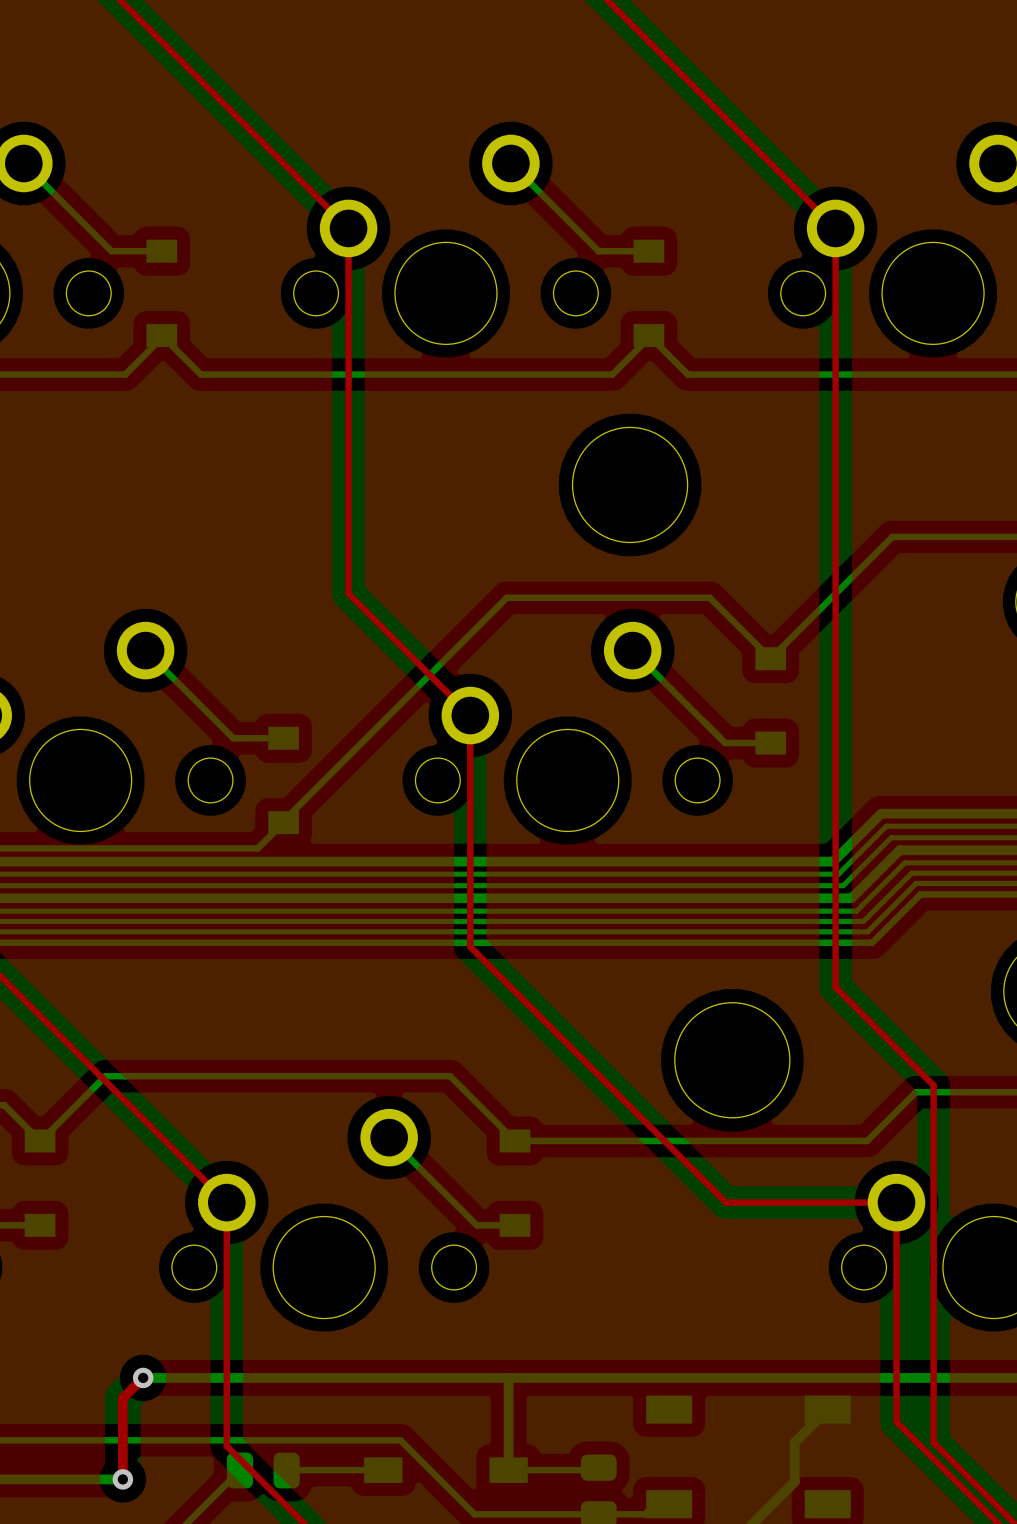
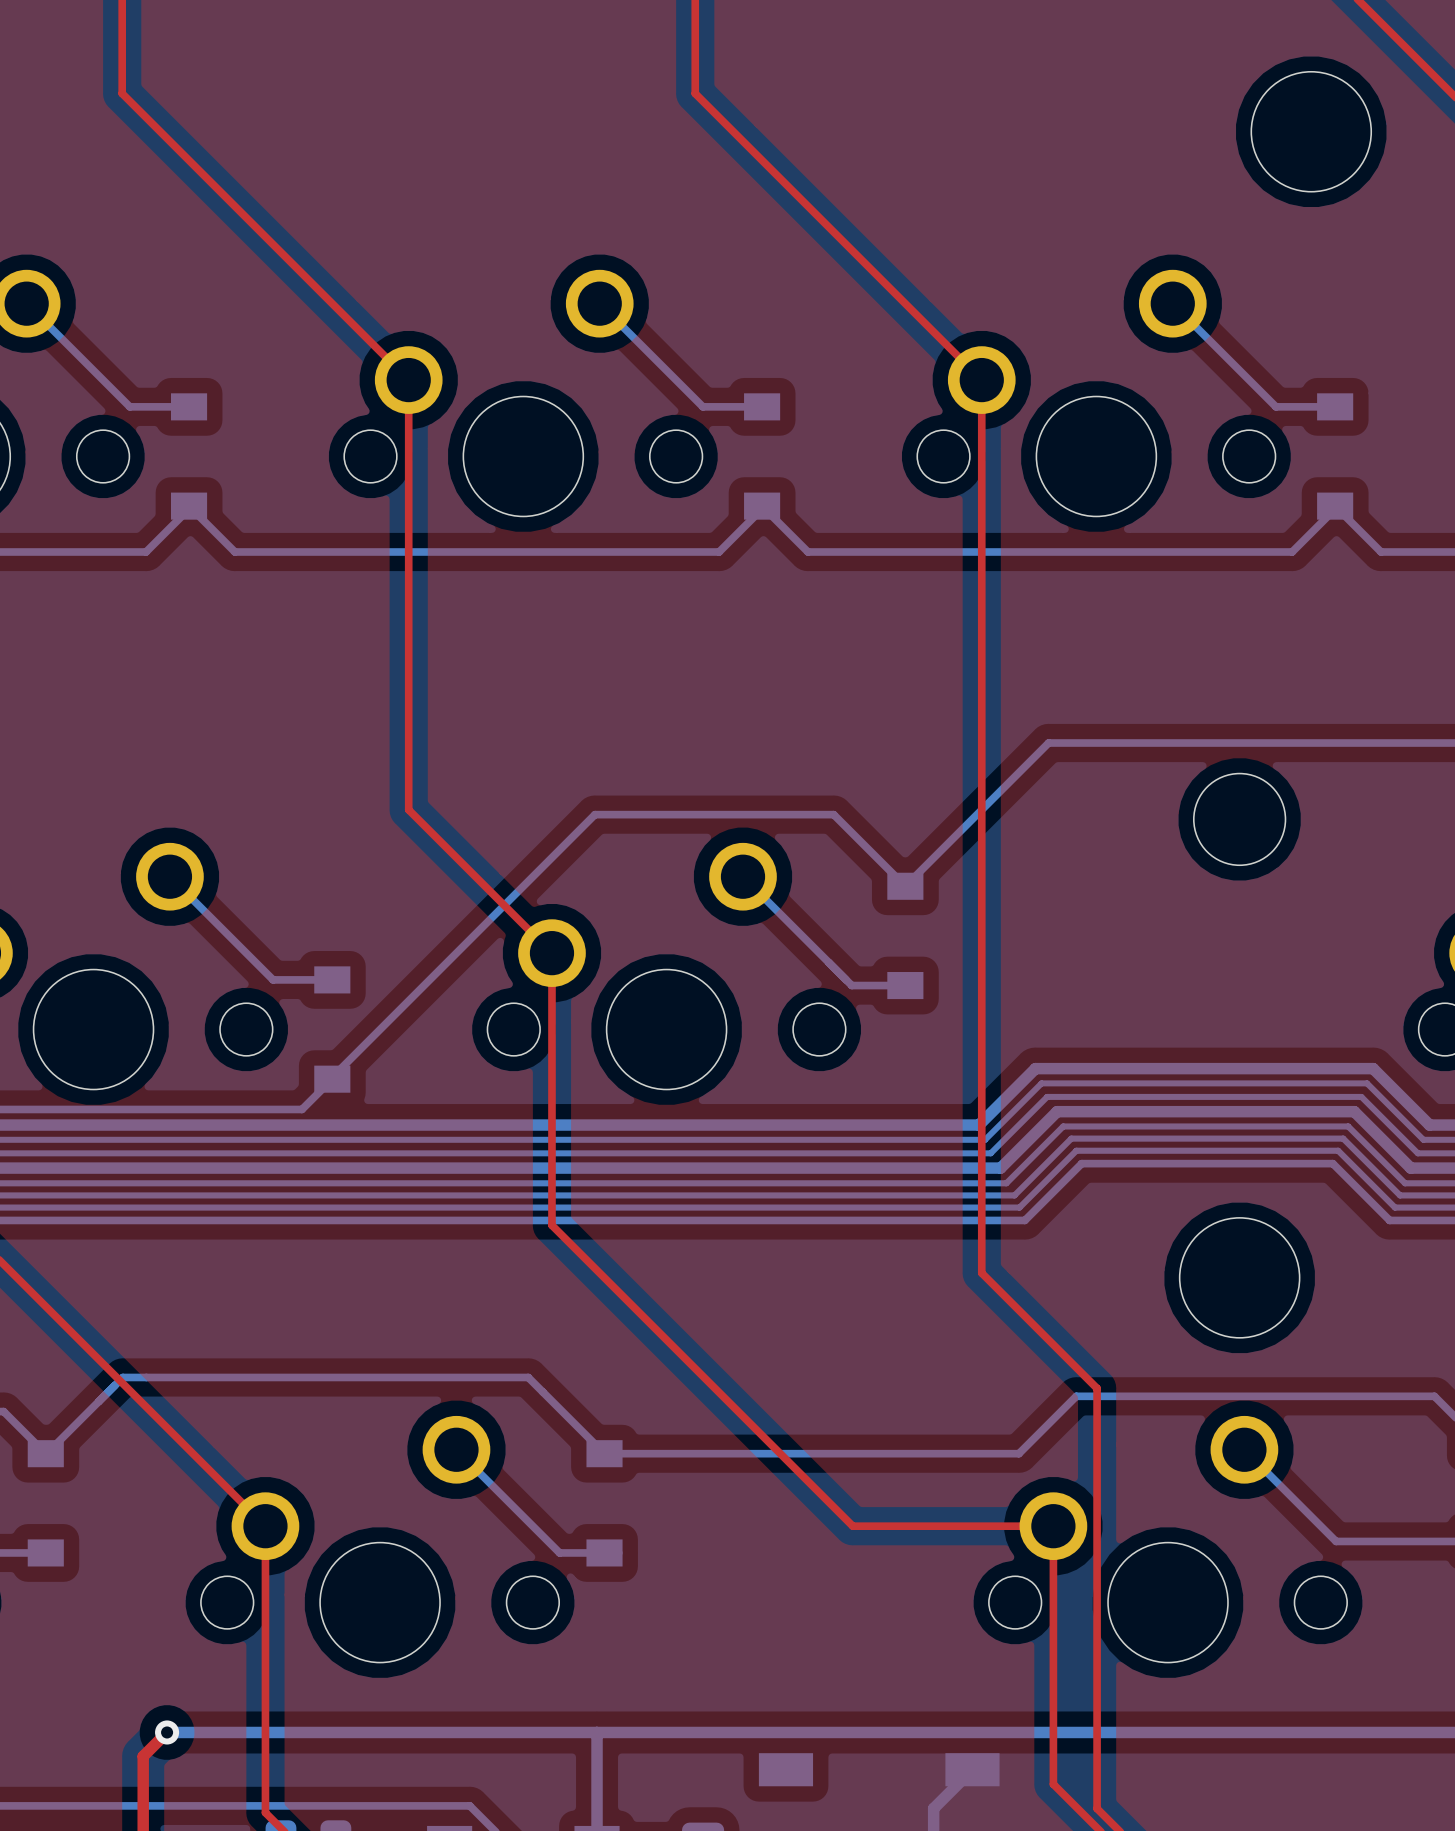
round board edge: [571, 426, 689, 544] -> none
round board edge: [674, 1002, 791, 1119] -> none

